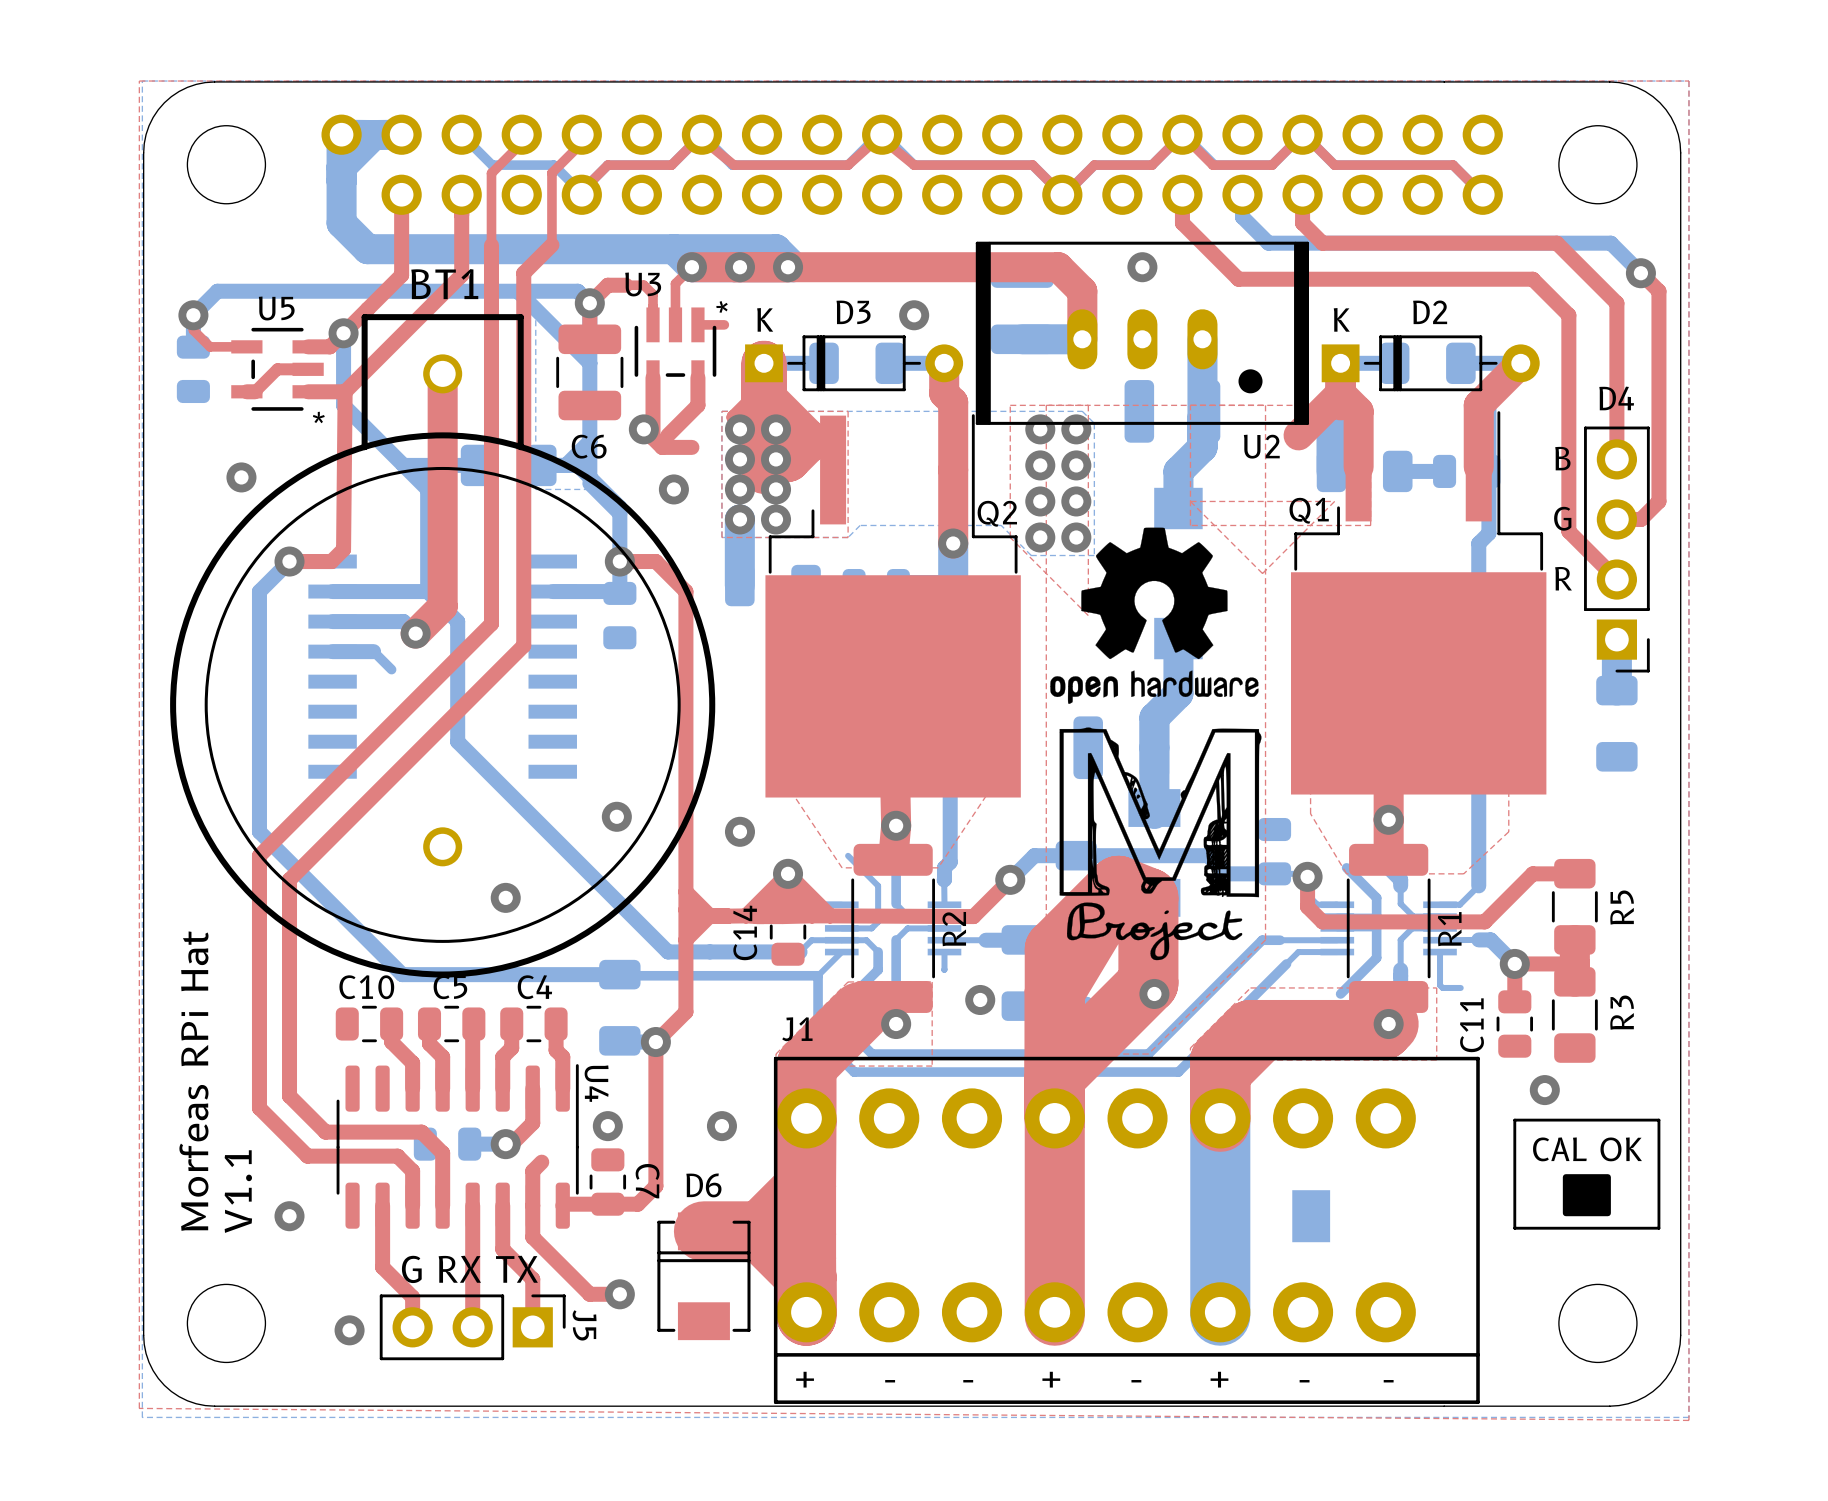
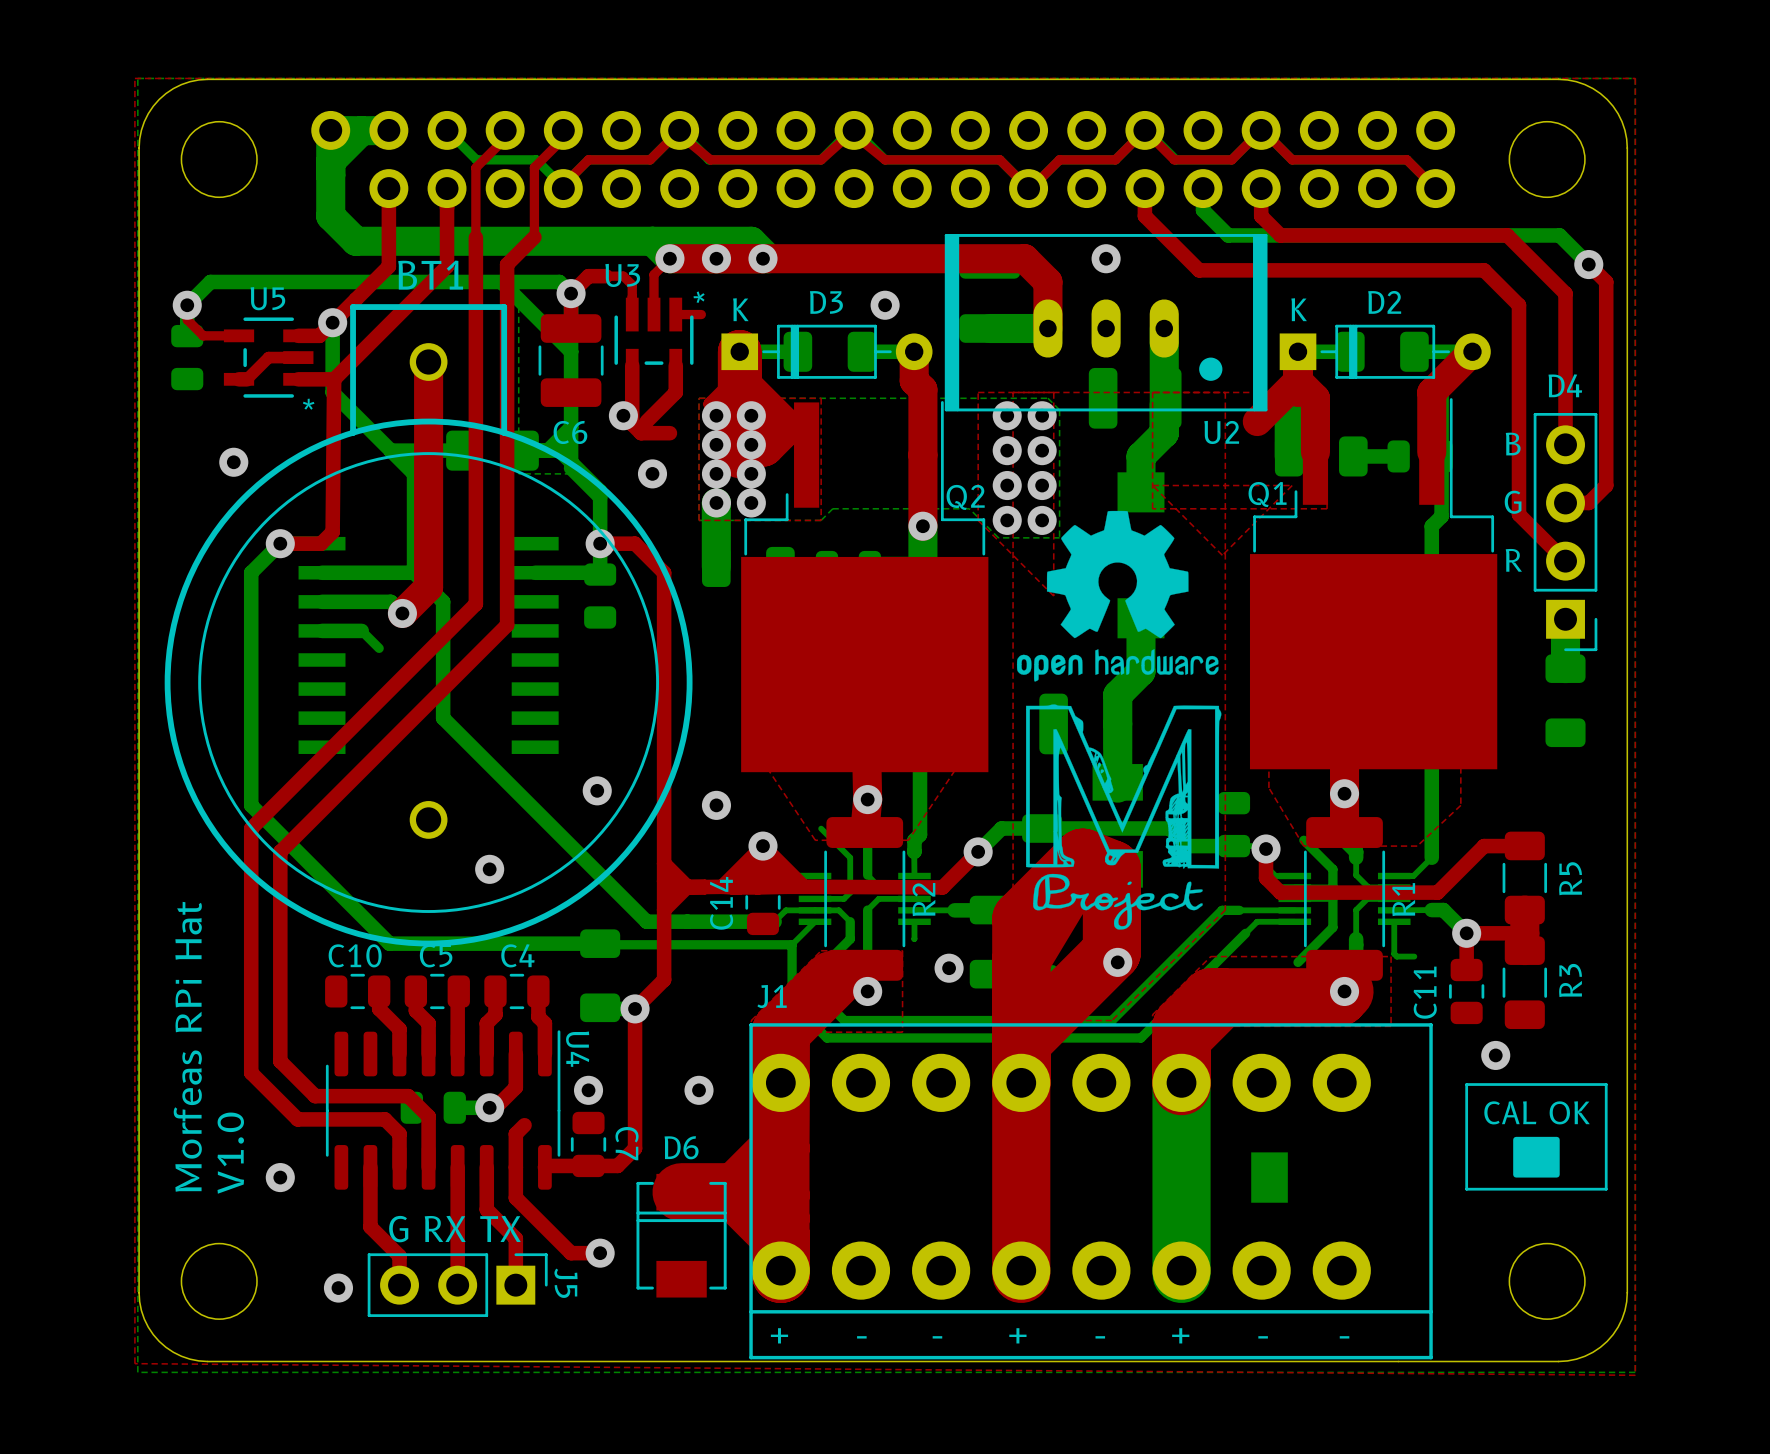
text: V1.1 (238, 1191) -> V1.0 (230, 1153)

